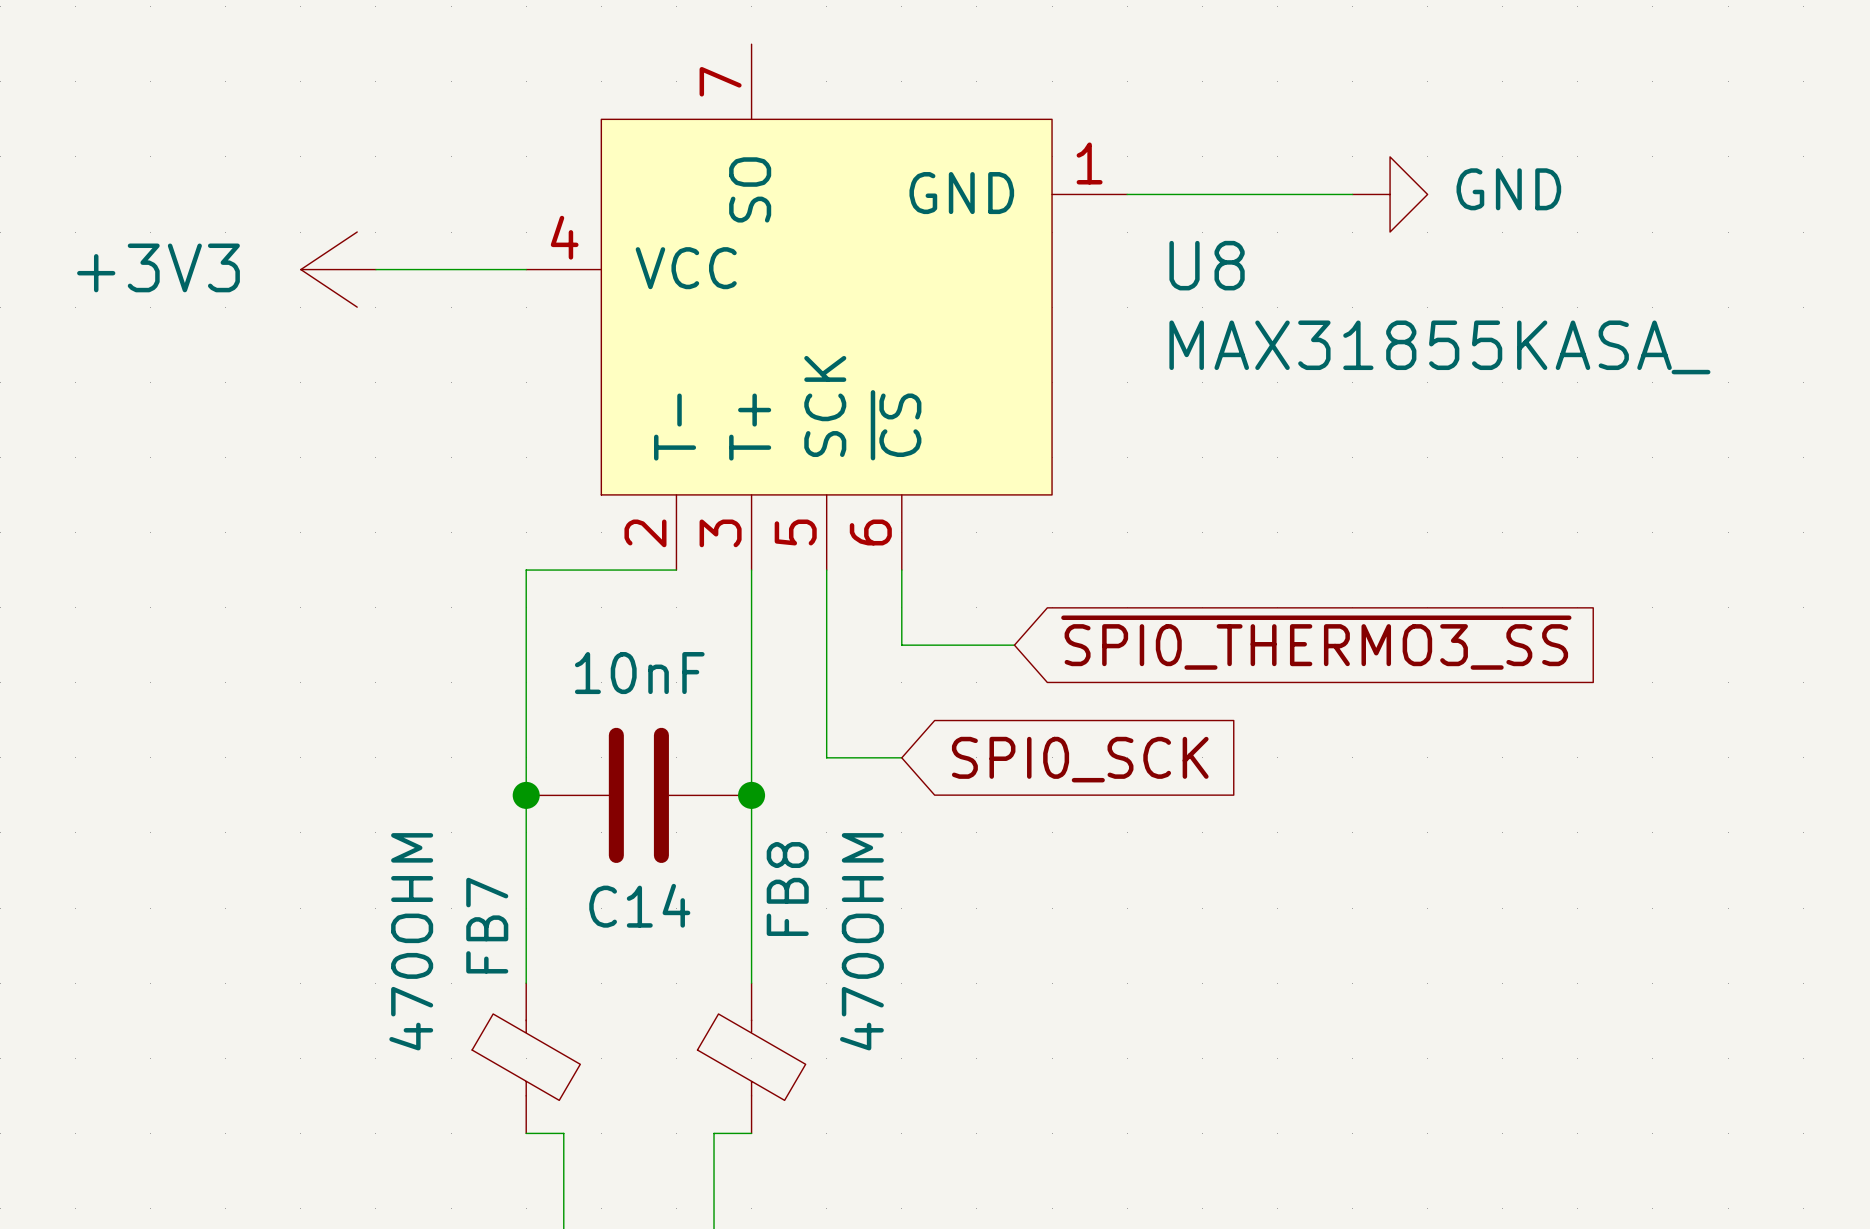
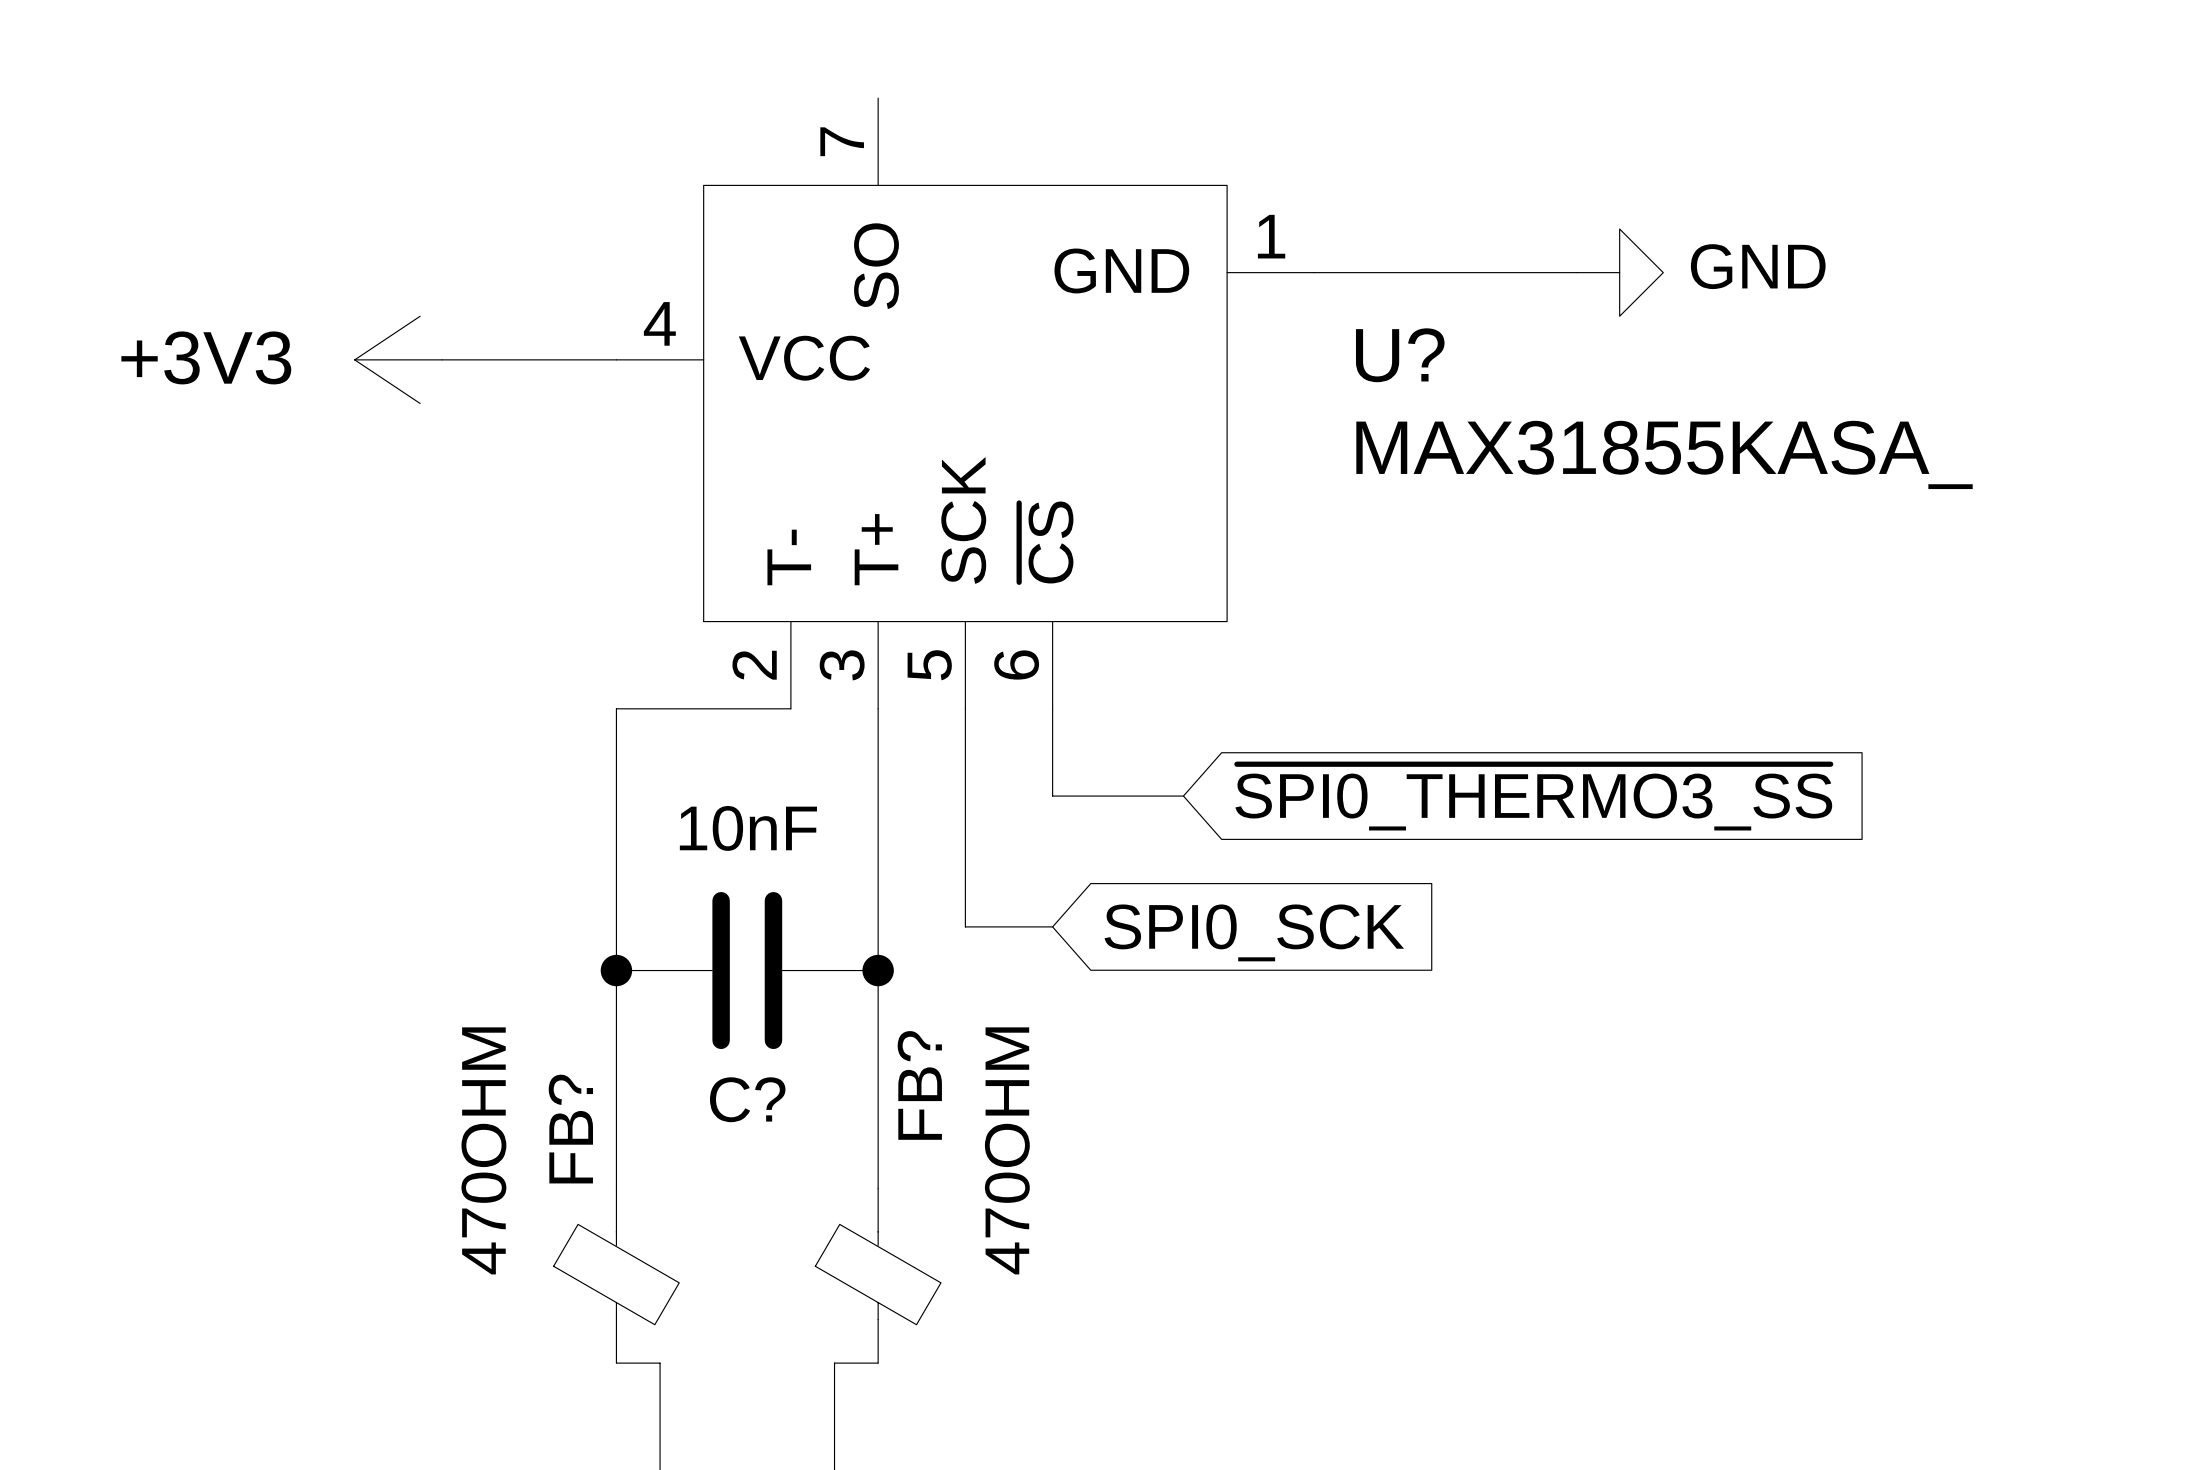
U8 name: U8 (1207, 265) -> U? (1400, 355)
FB8 name: FB8 (787, 889) -> FB? (919, 1085)
C14 name: C14 (639, 905) -> C? (747, 1099)
FB7 name: FB7 (487, 925) -> FB? (570, 1129)

